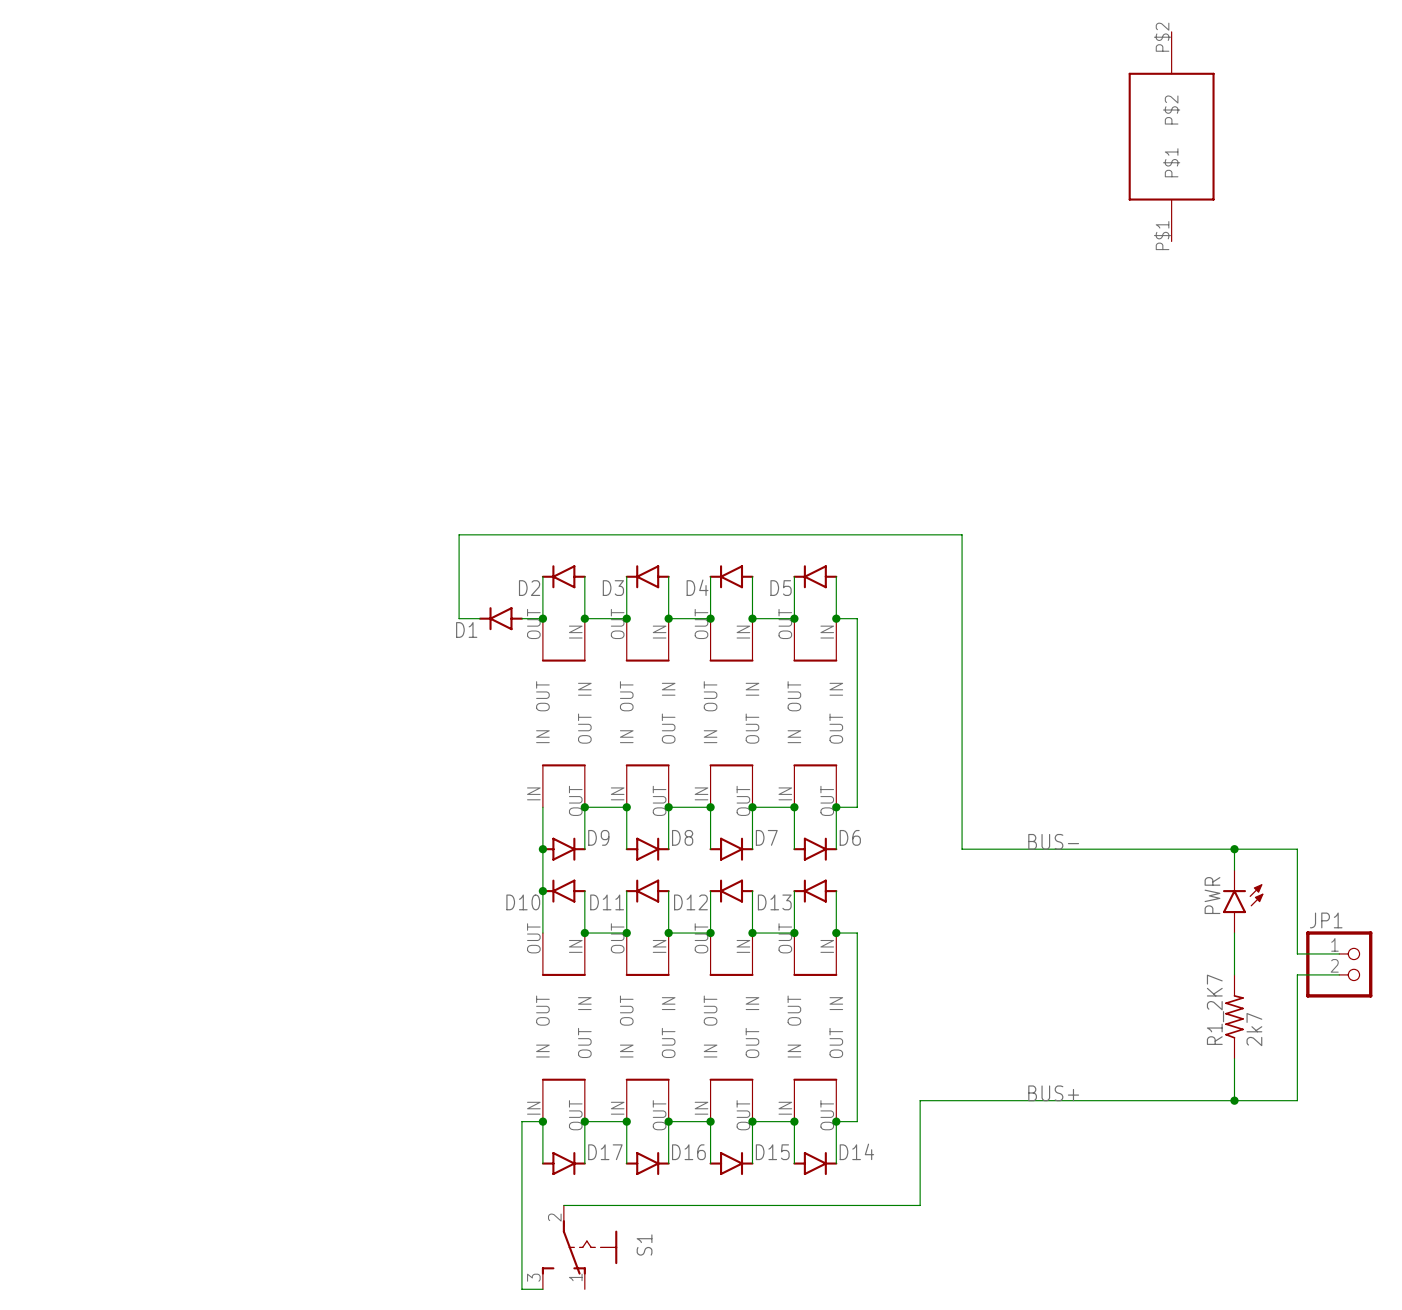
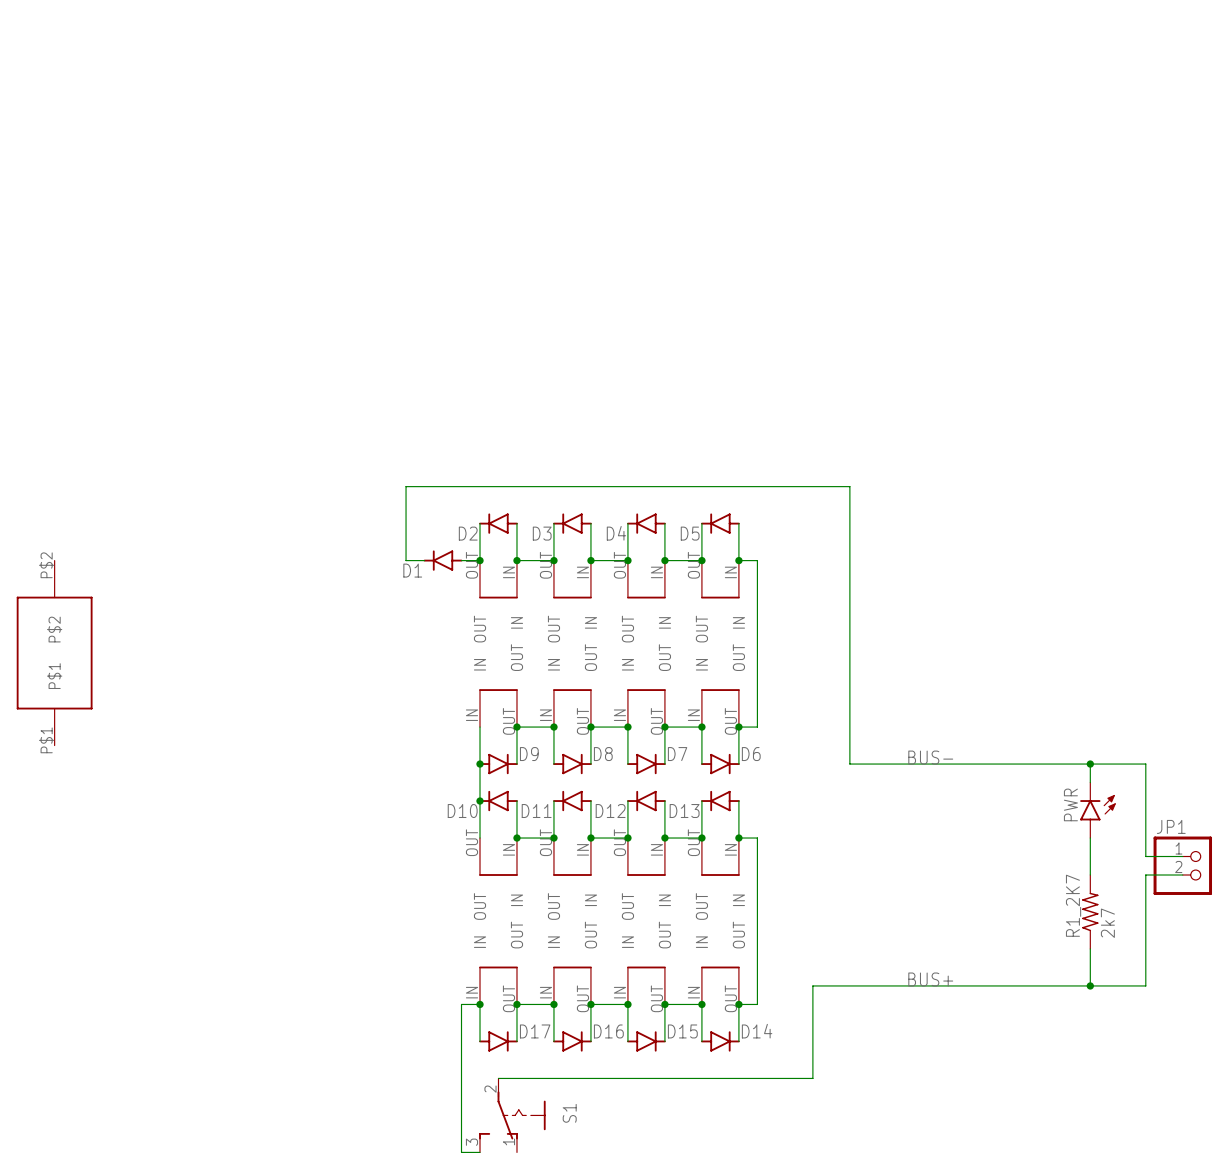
part: (1171, 136) -> none
part: none -> (54, 653)

